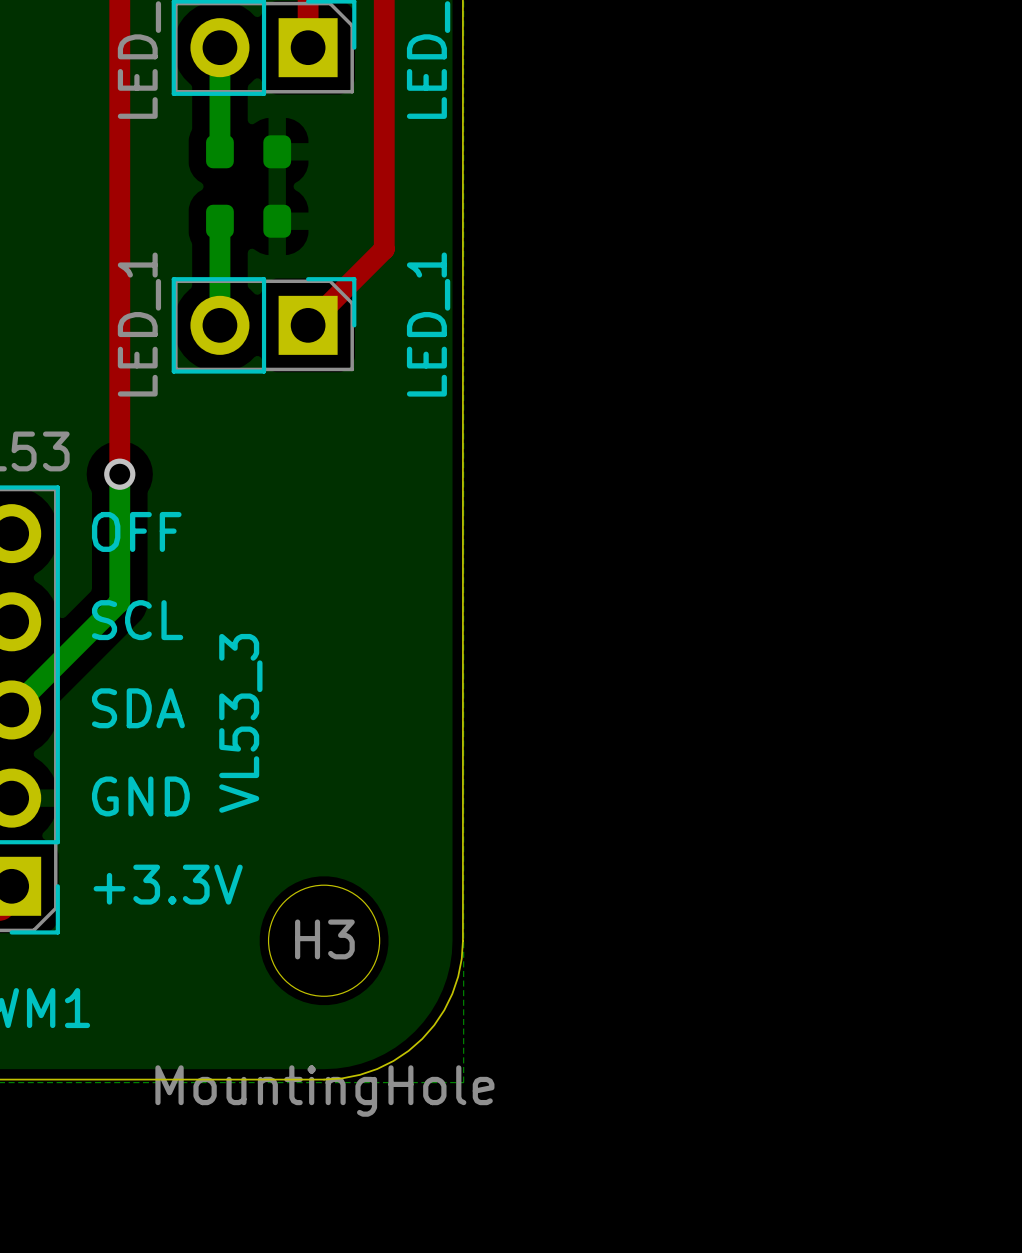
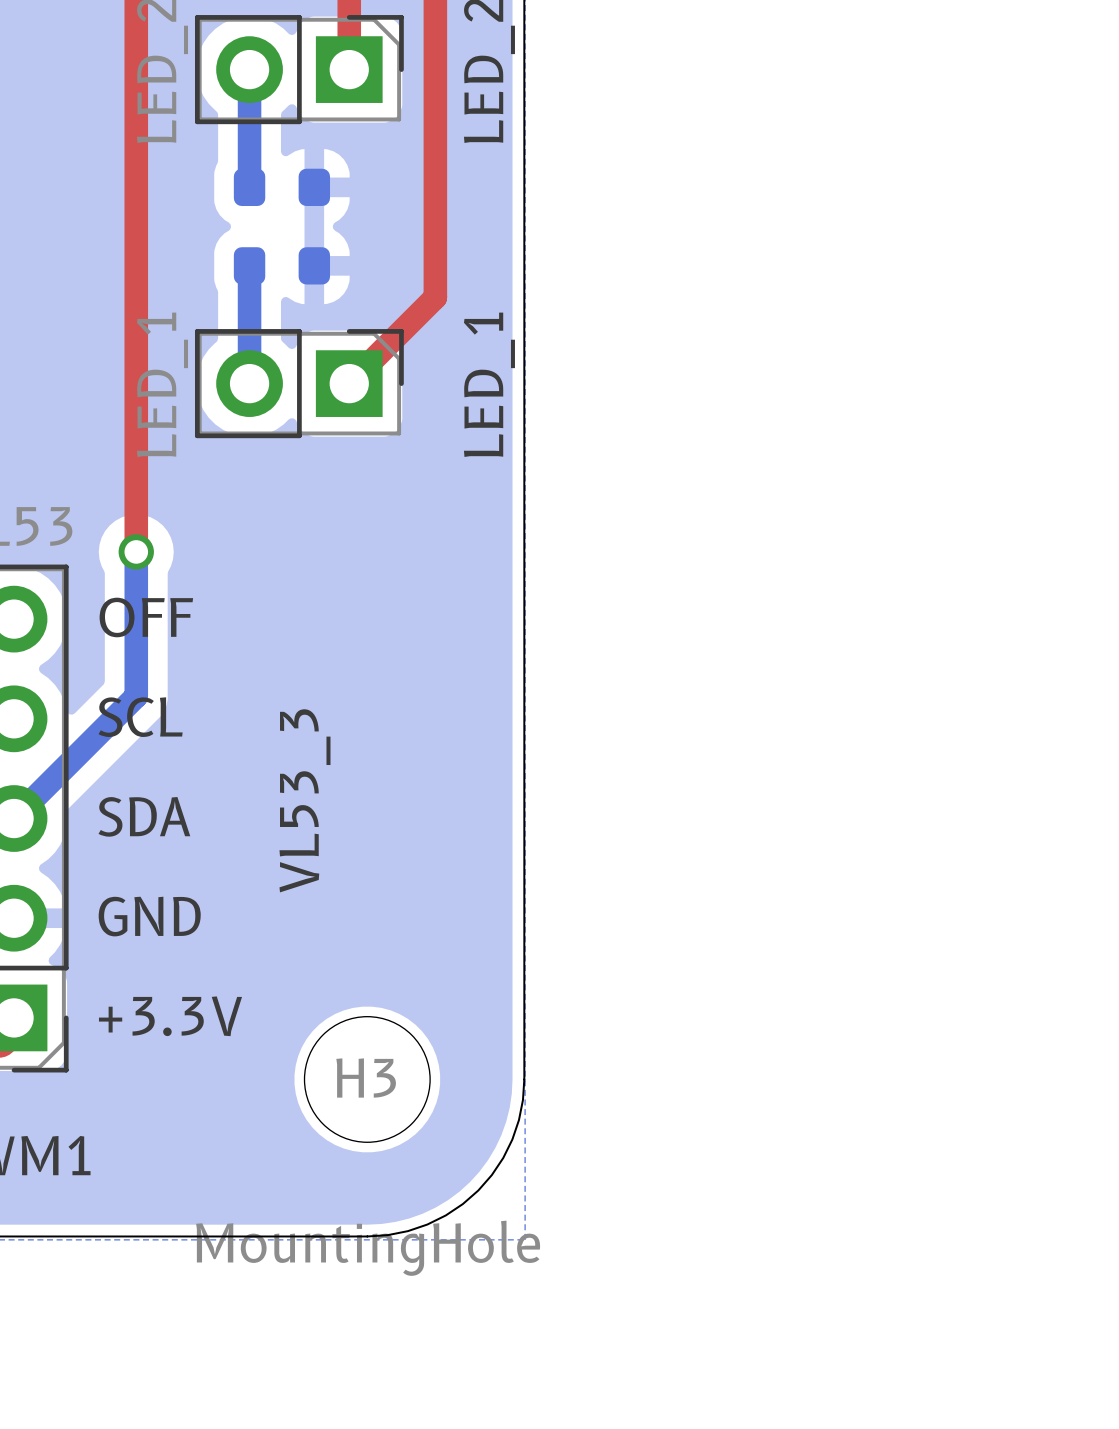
VL53_3 name position: VL53_3 (240, 723) -> VL53_3 (304, 800)

